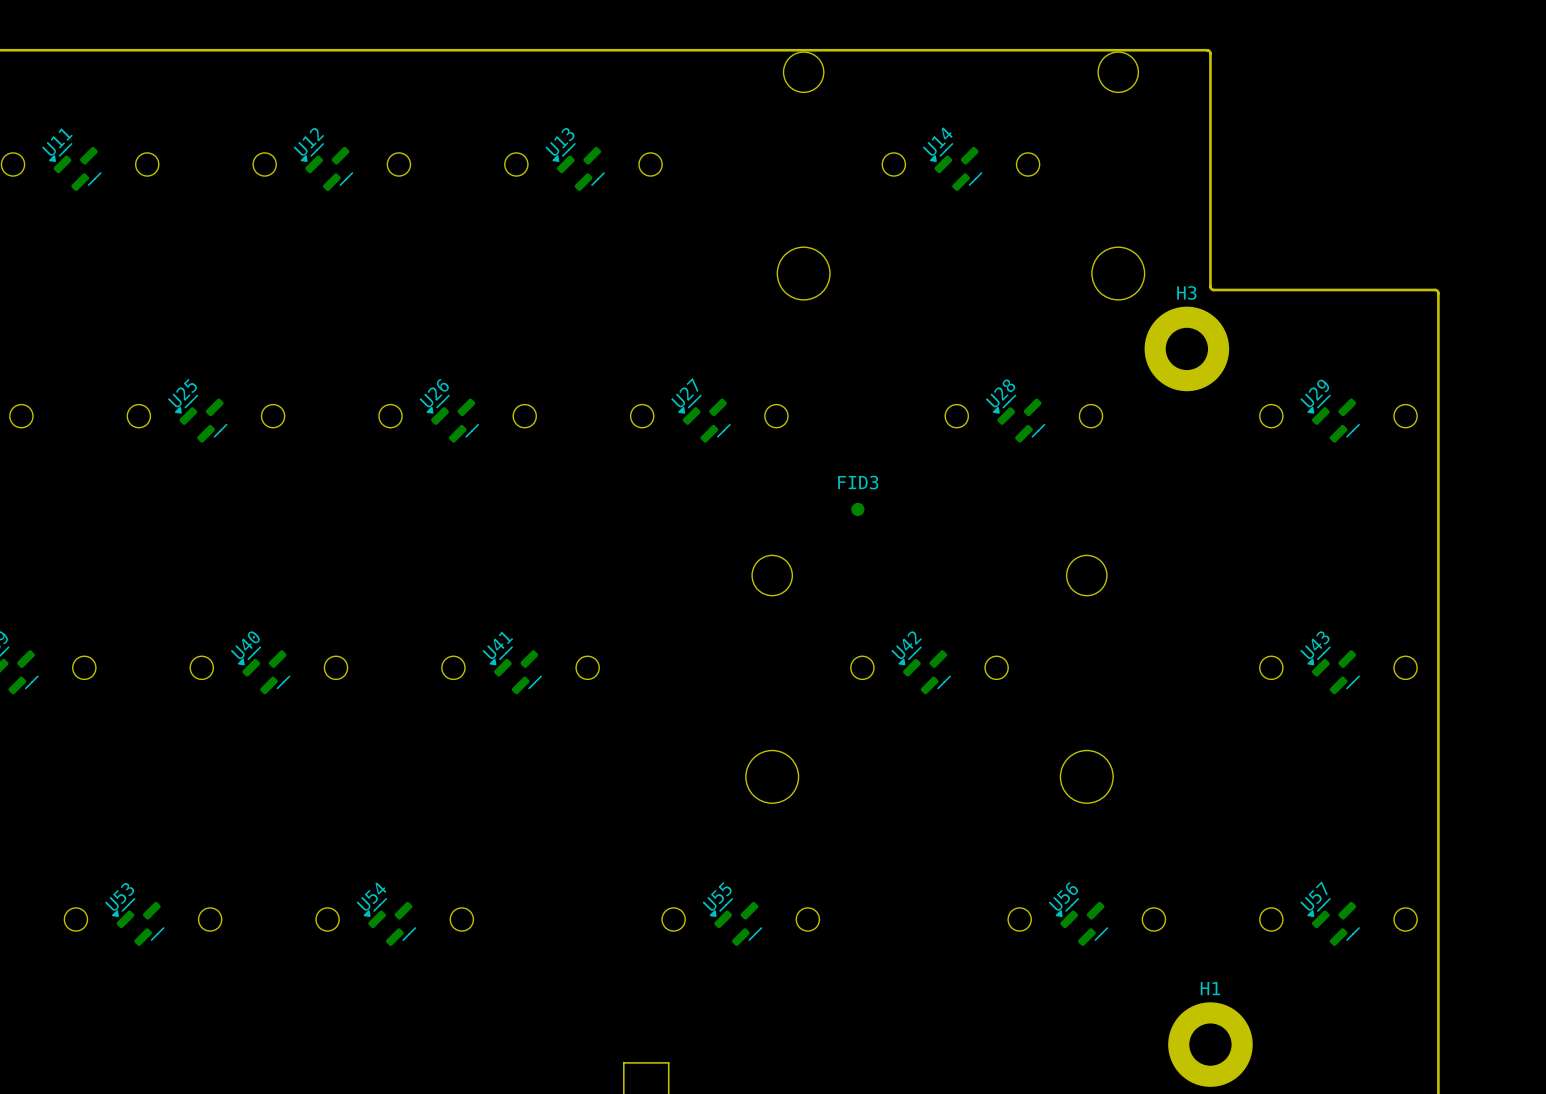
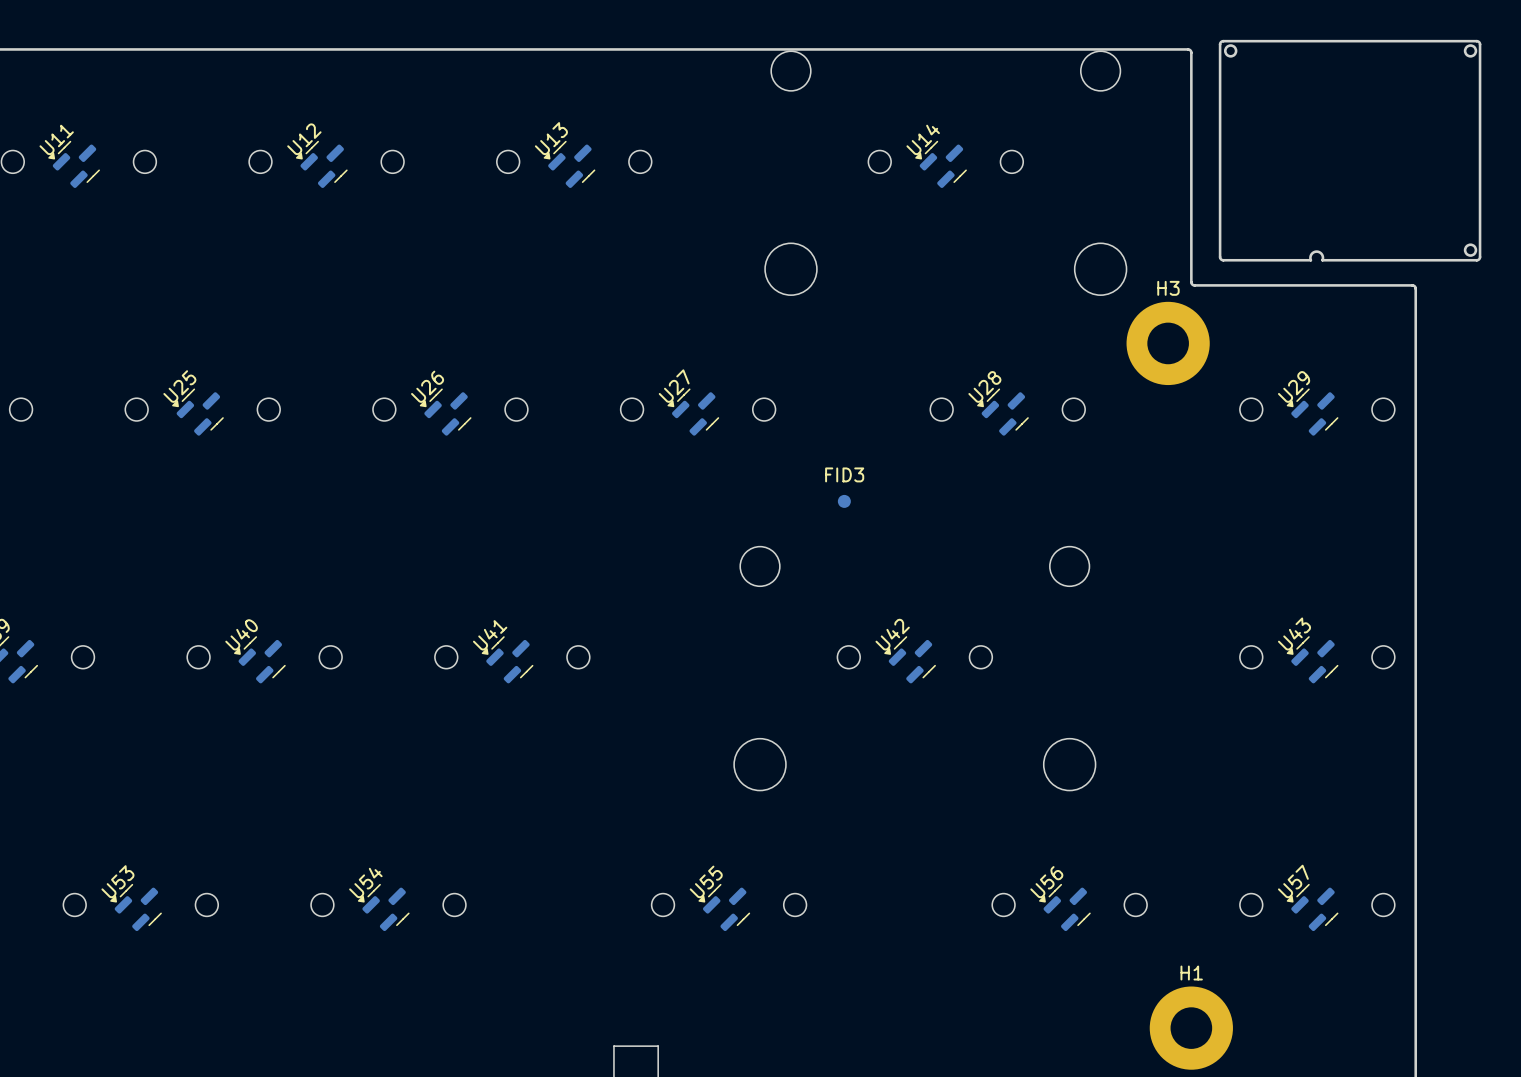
board edge: none -> (1476, 41) (1221, 41) (1220, 258) (1310, 260) (1311, 254) (1316, 251) (1322, 254) (1322, 260) (1478, 259) (1480, 44) (1476, 41)
round board edge: none -> [1223, 44, 1238, 58]
round board edge: none -> [1463, 44, 1478, 58]
round board edge: none -> [1463, 243, 1478, 257]

